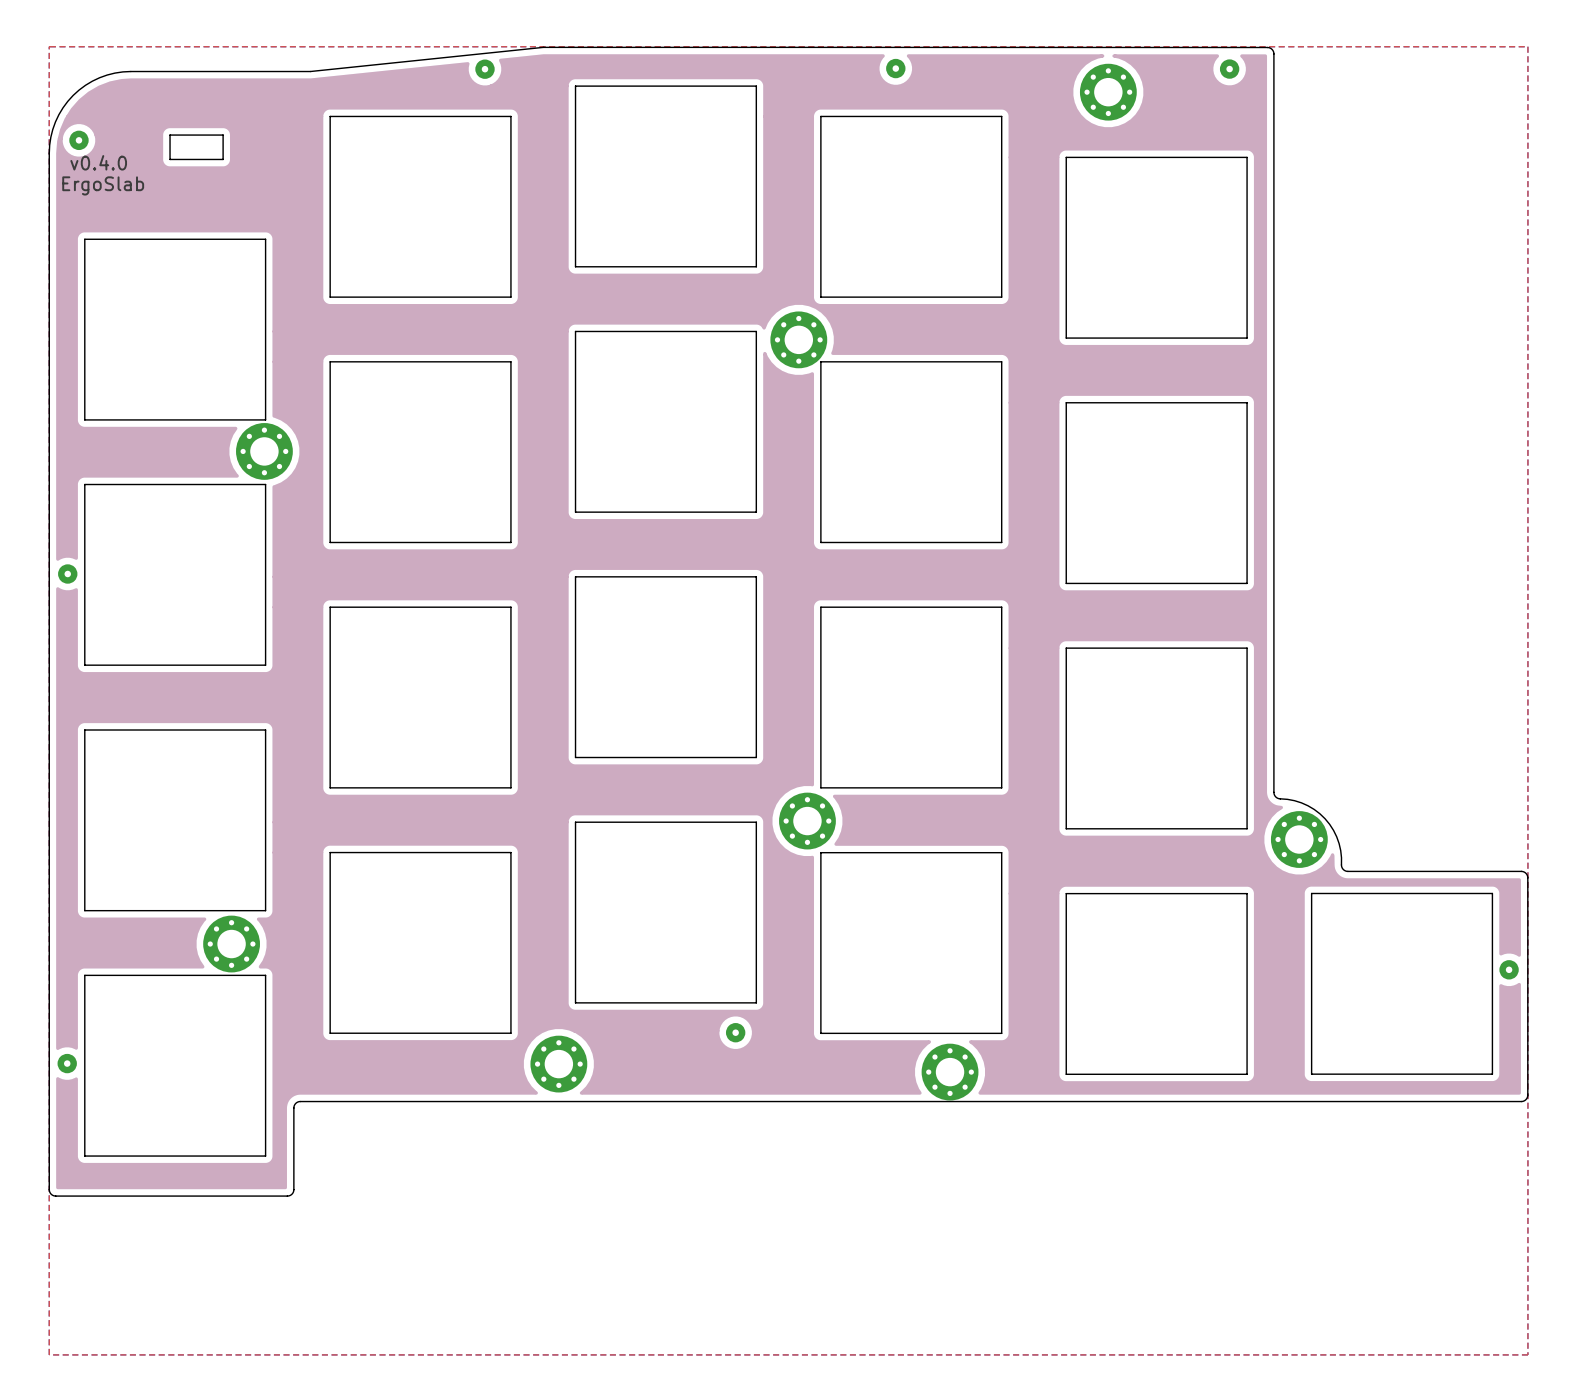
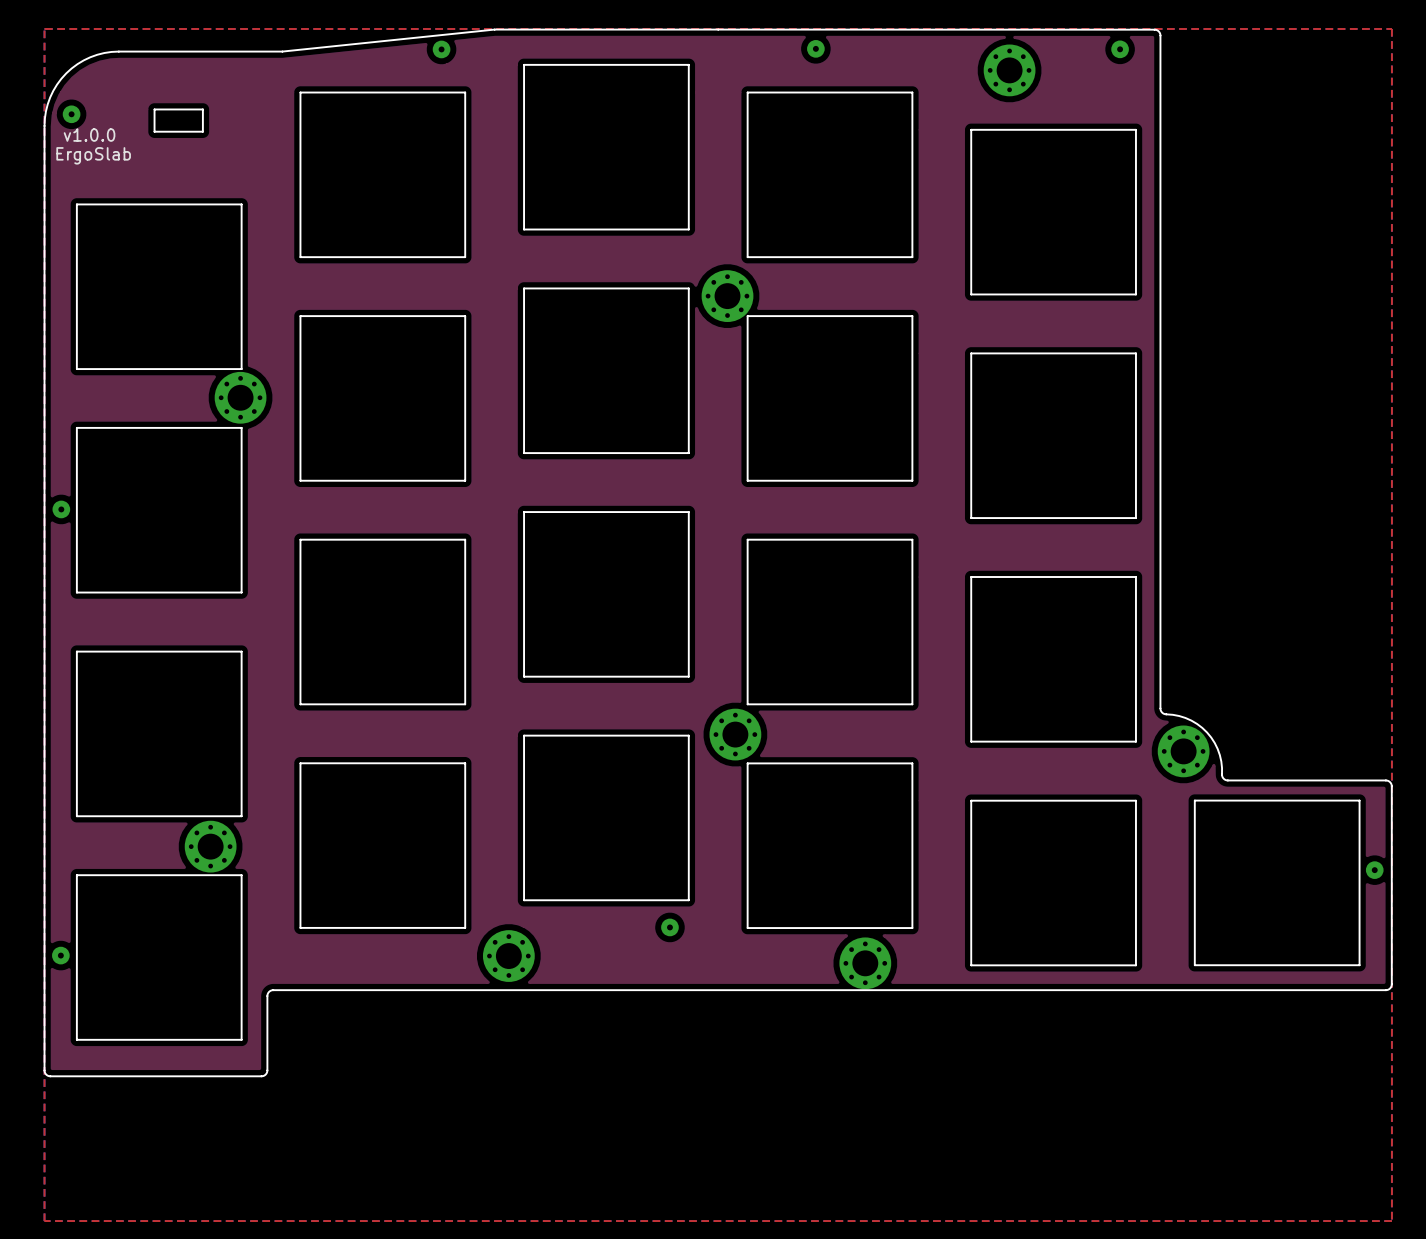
text: v0.4.0 (98, 162) -> v1.0.0 (89, 135)

